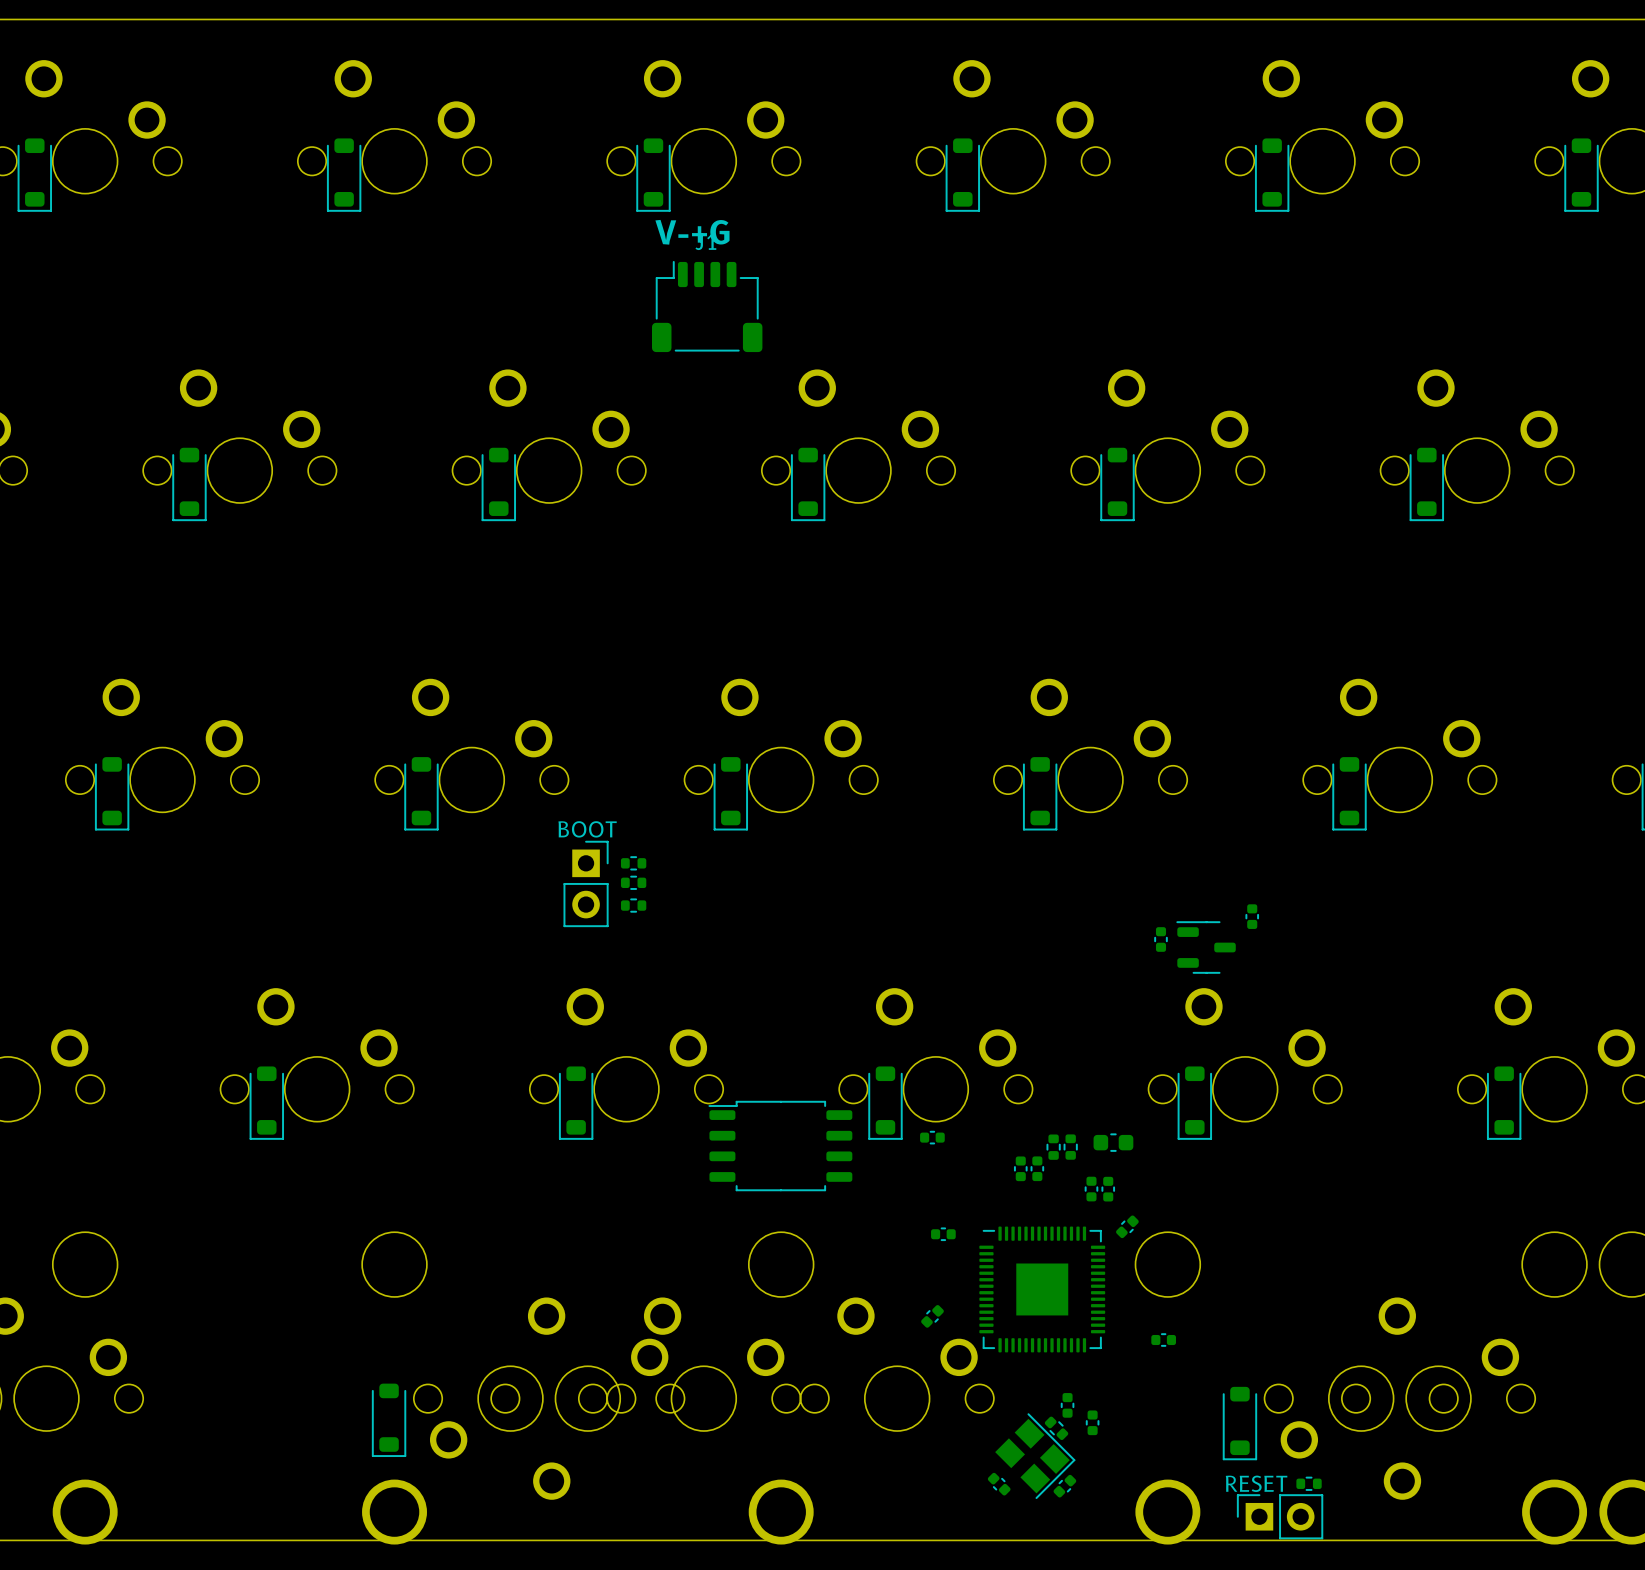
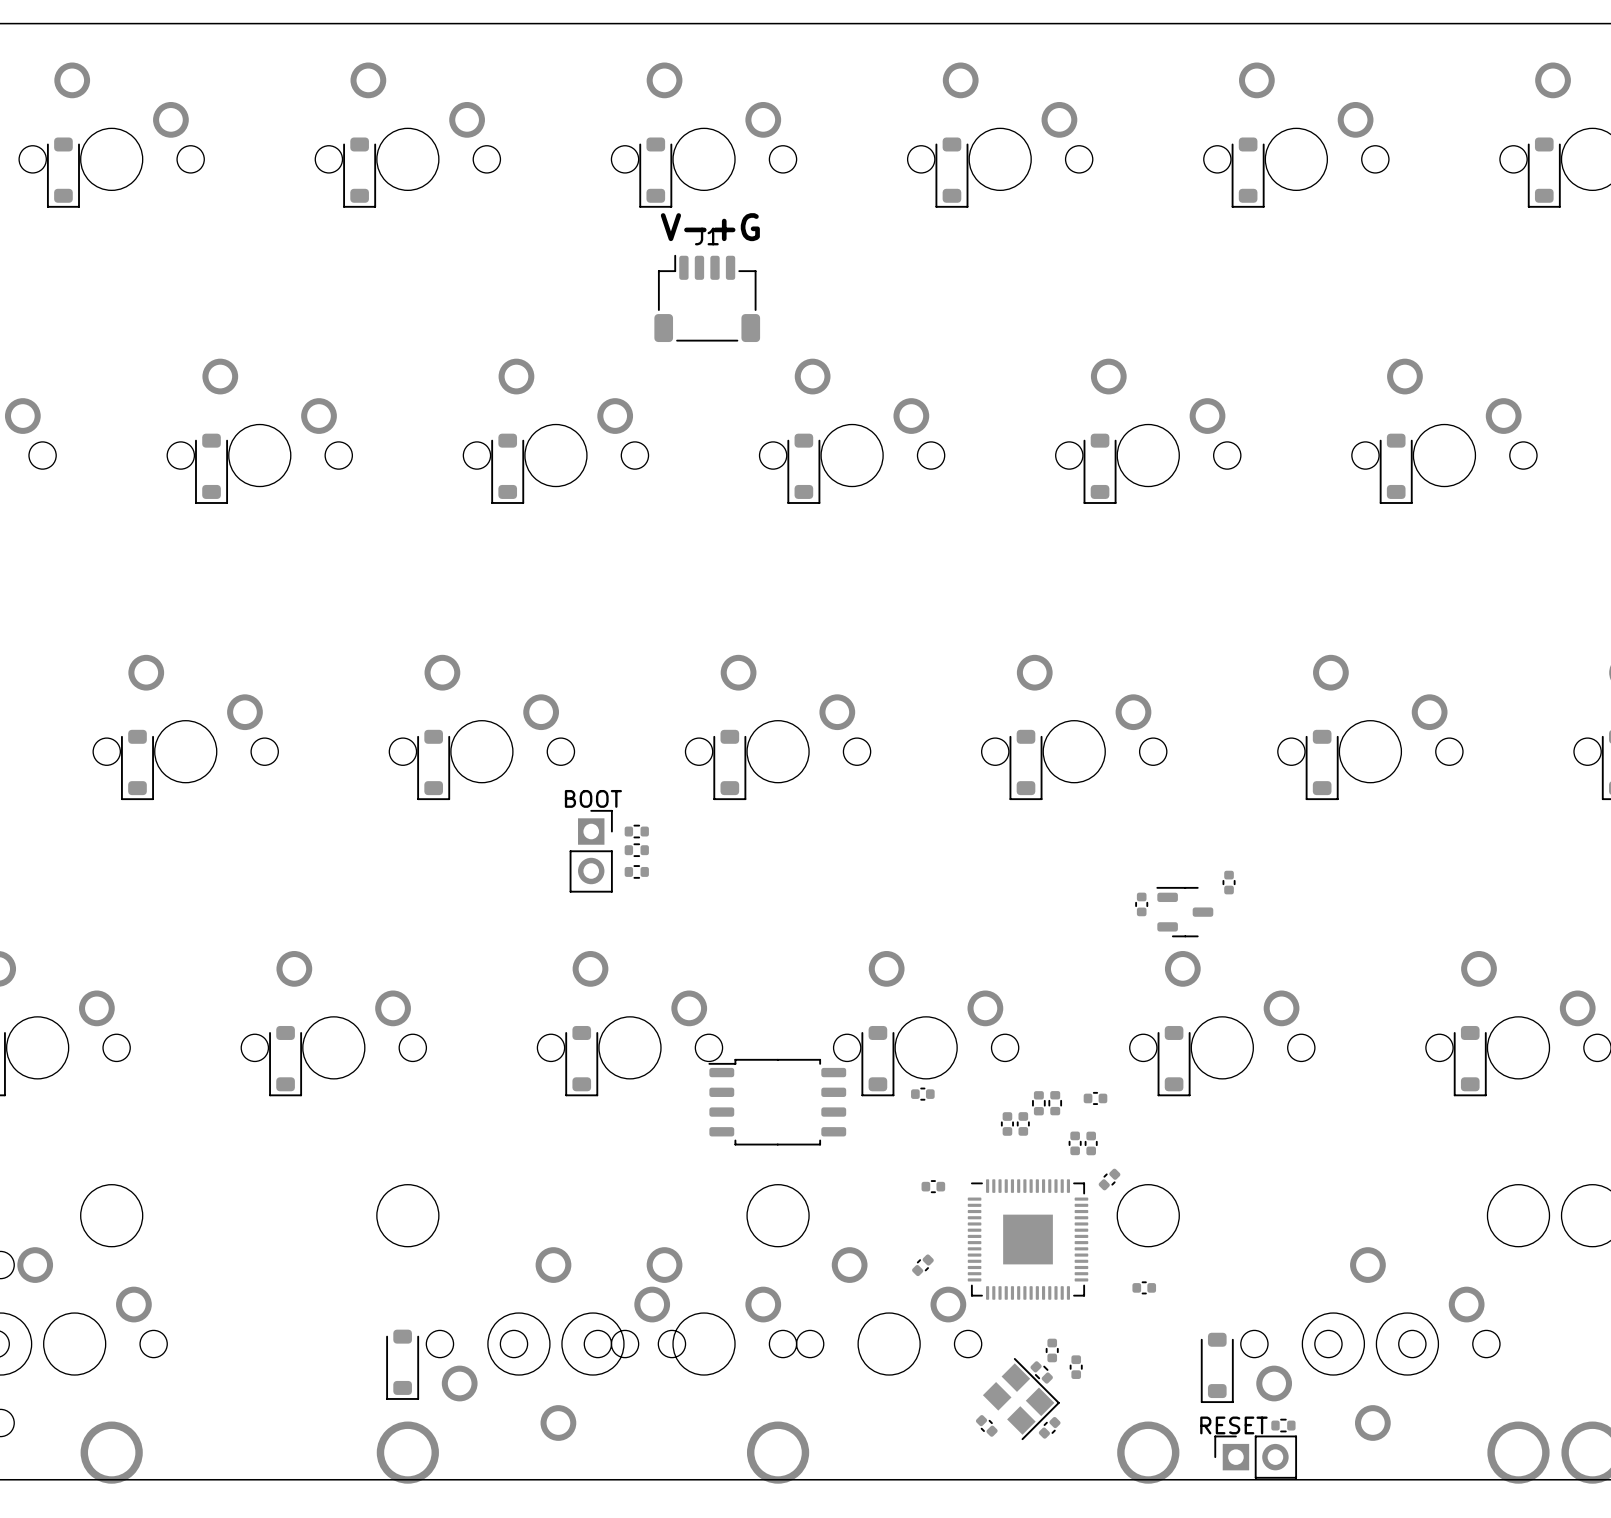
part footprint: [1093, 1133, 1134, 1152] -> [1083, 1091, 1108, 1105]

